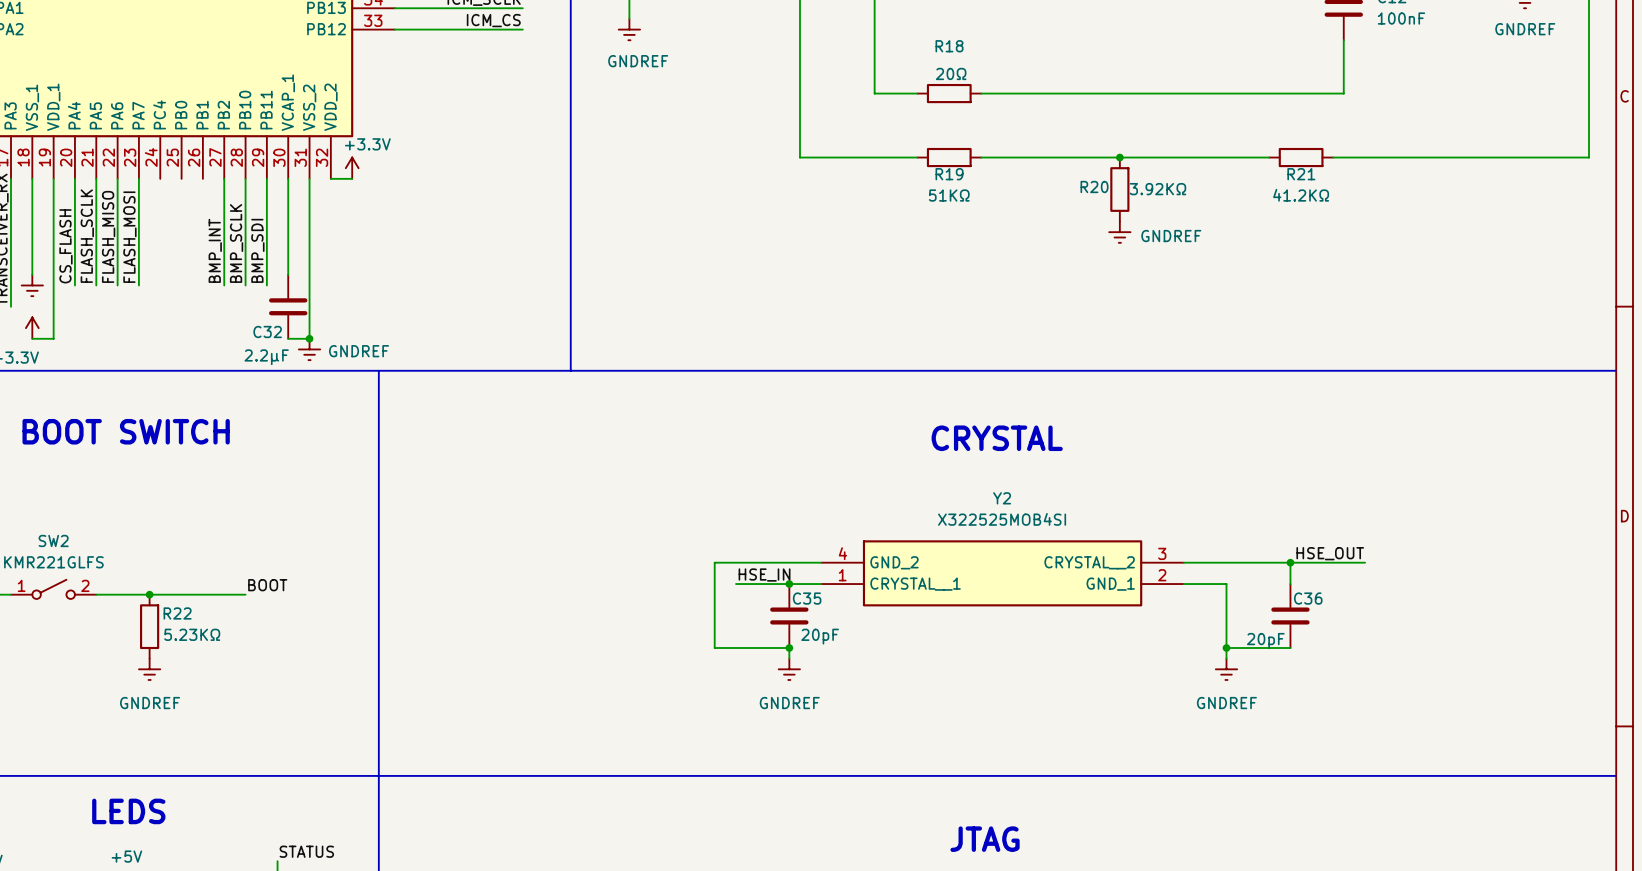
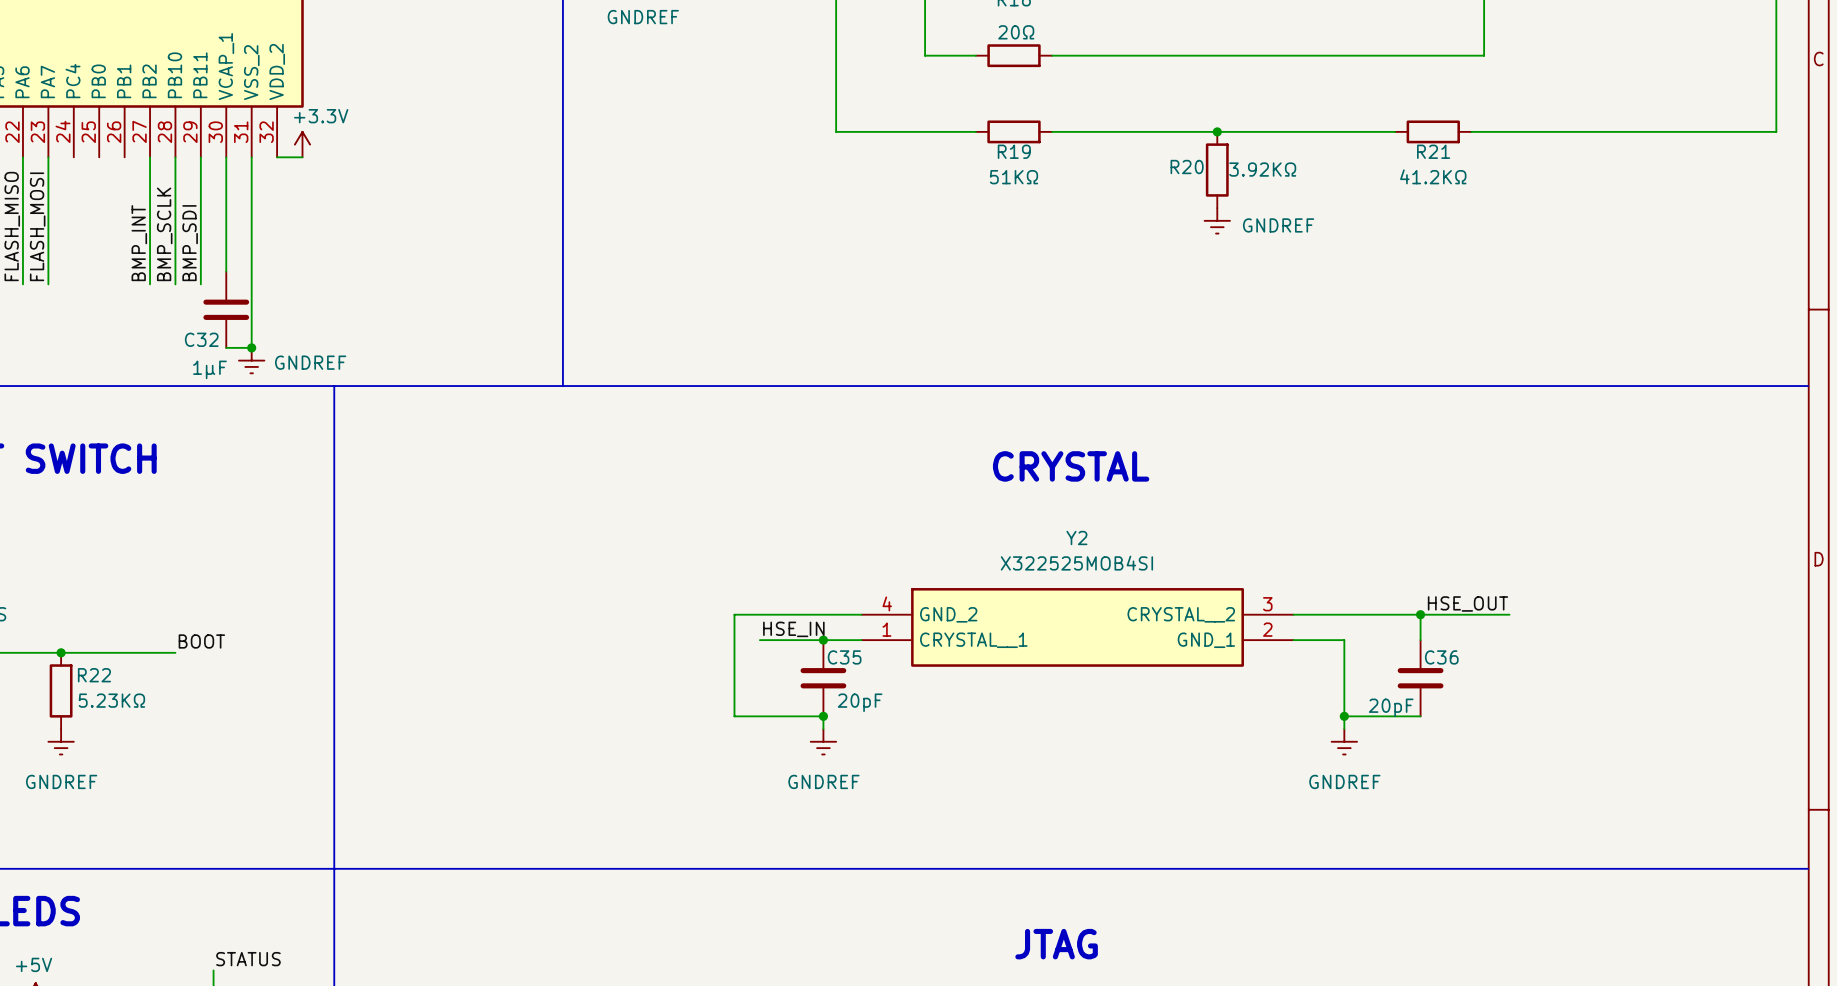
C32 value: 2.2μF (266, 357) -> 1μF (209, 369)

